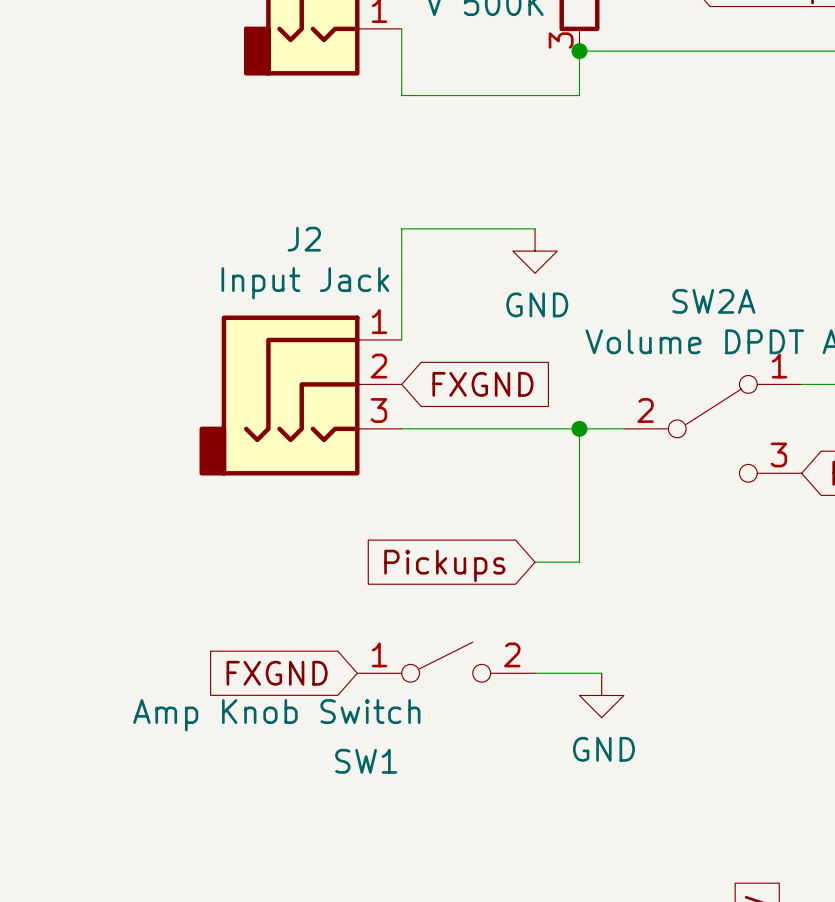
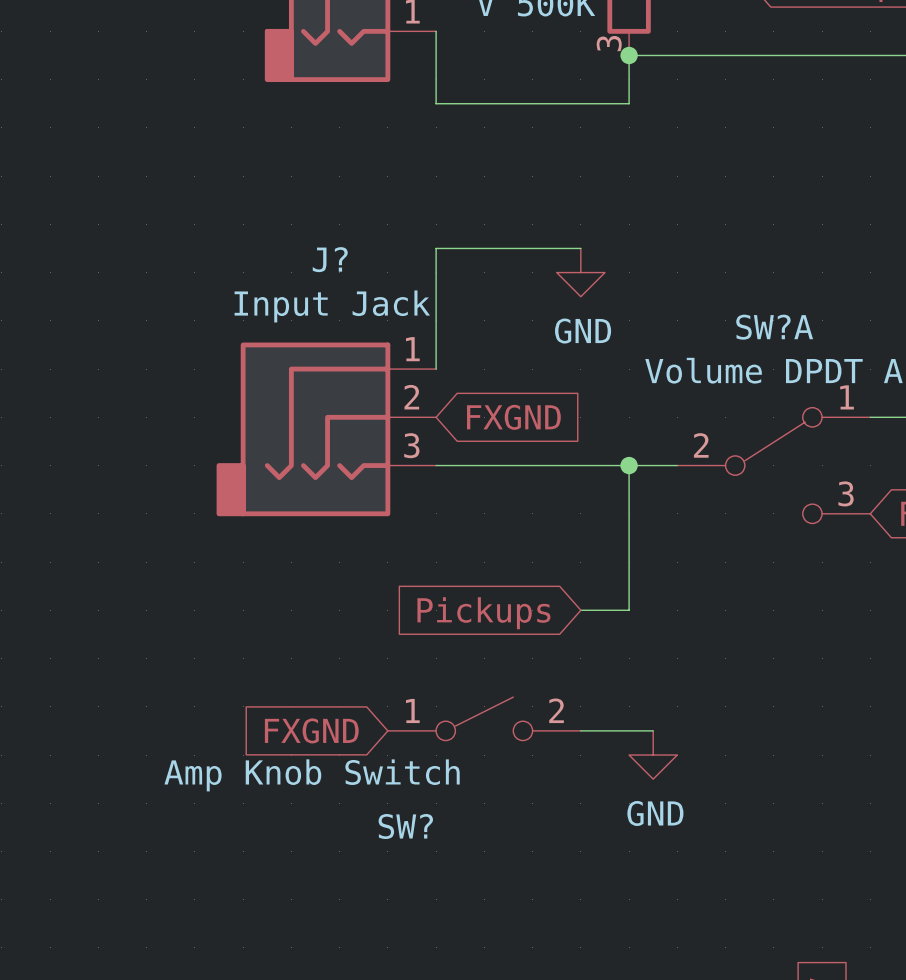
J2 name: J2 (304, 239) -> J? (330, 259)
SW2A name: SW2A (713, 301) -> SW?A (774, 327)
SW1 name: SW1 (366, 761) -> SW? (405, 826)

